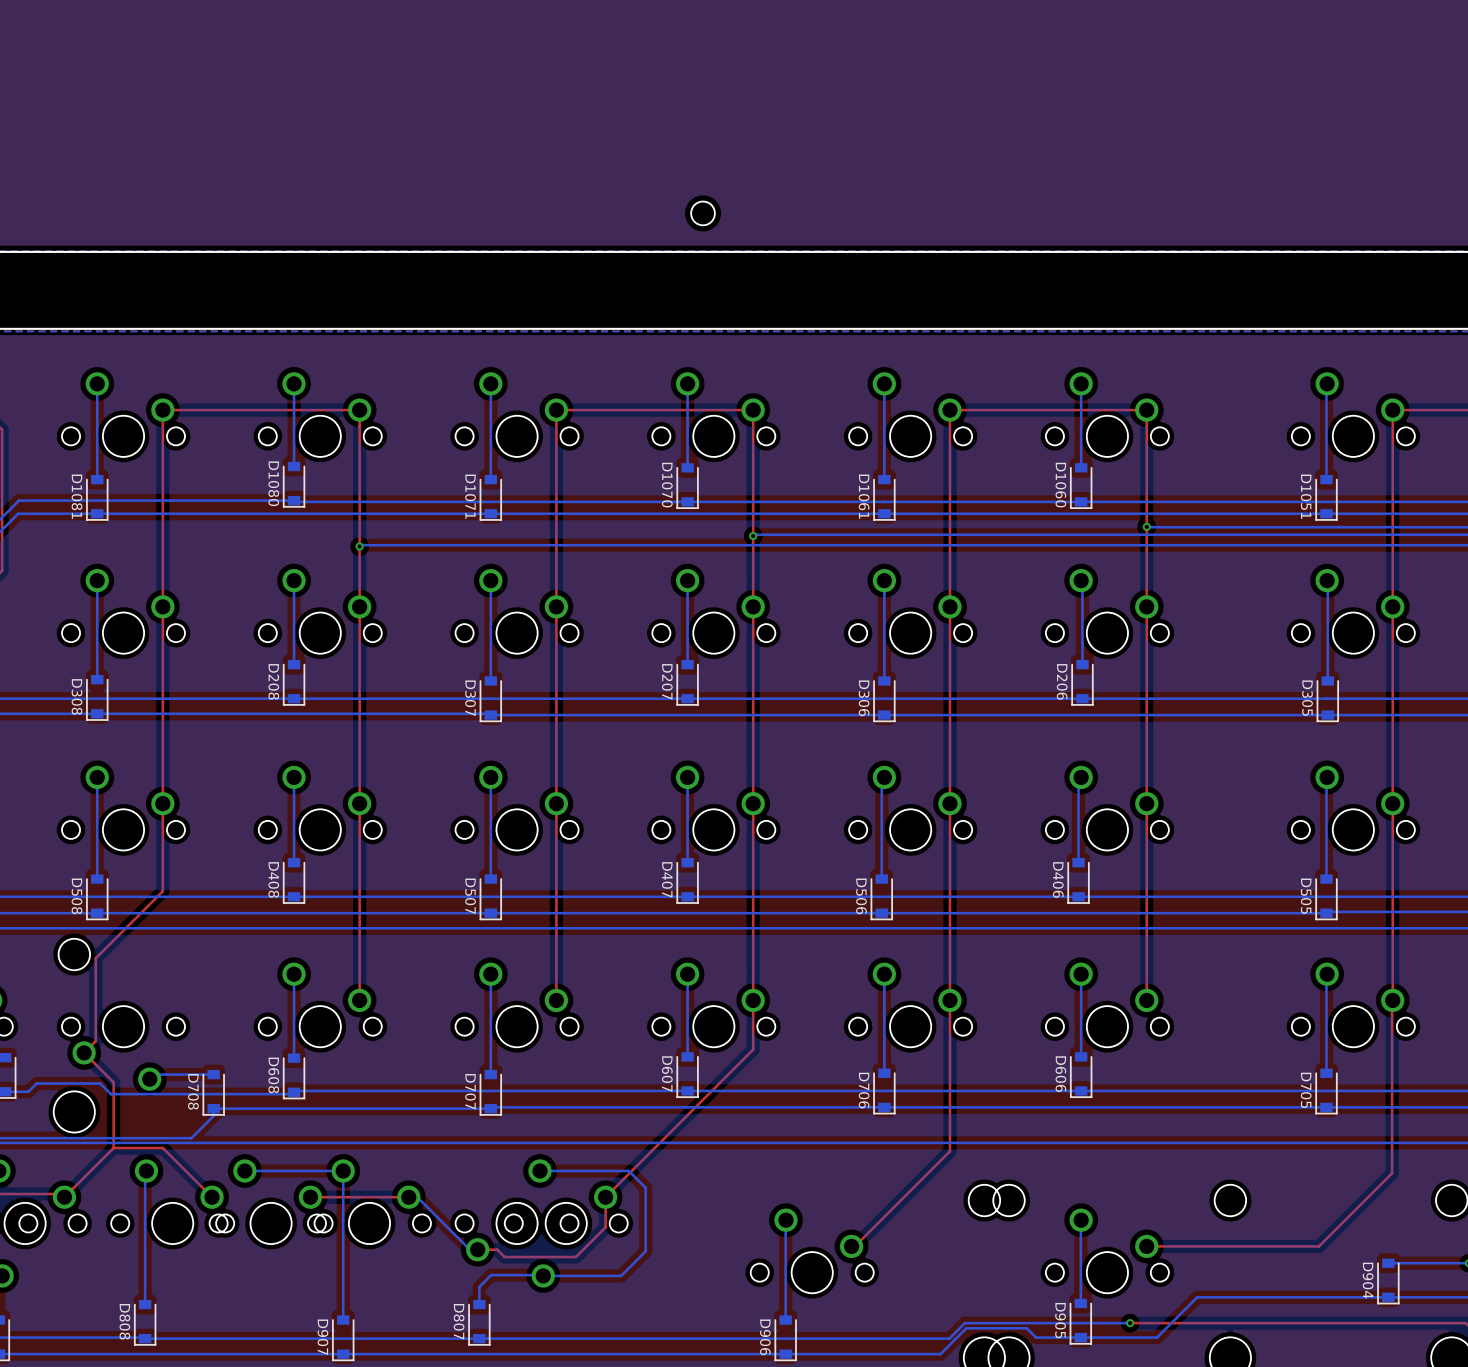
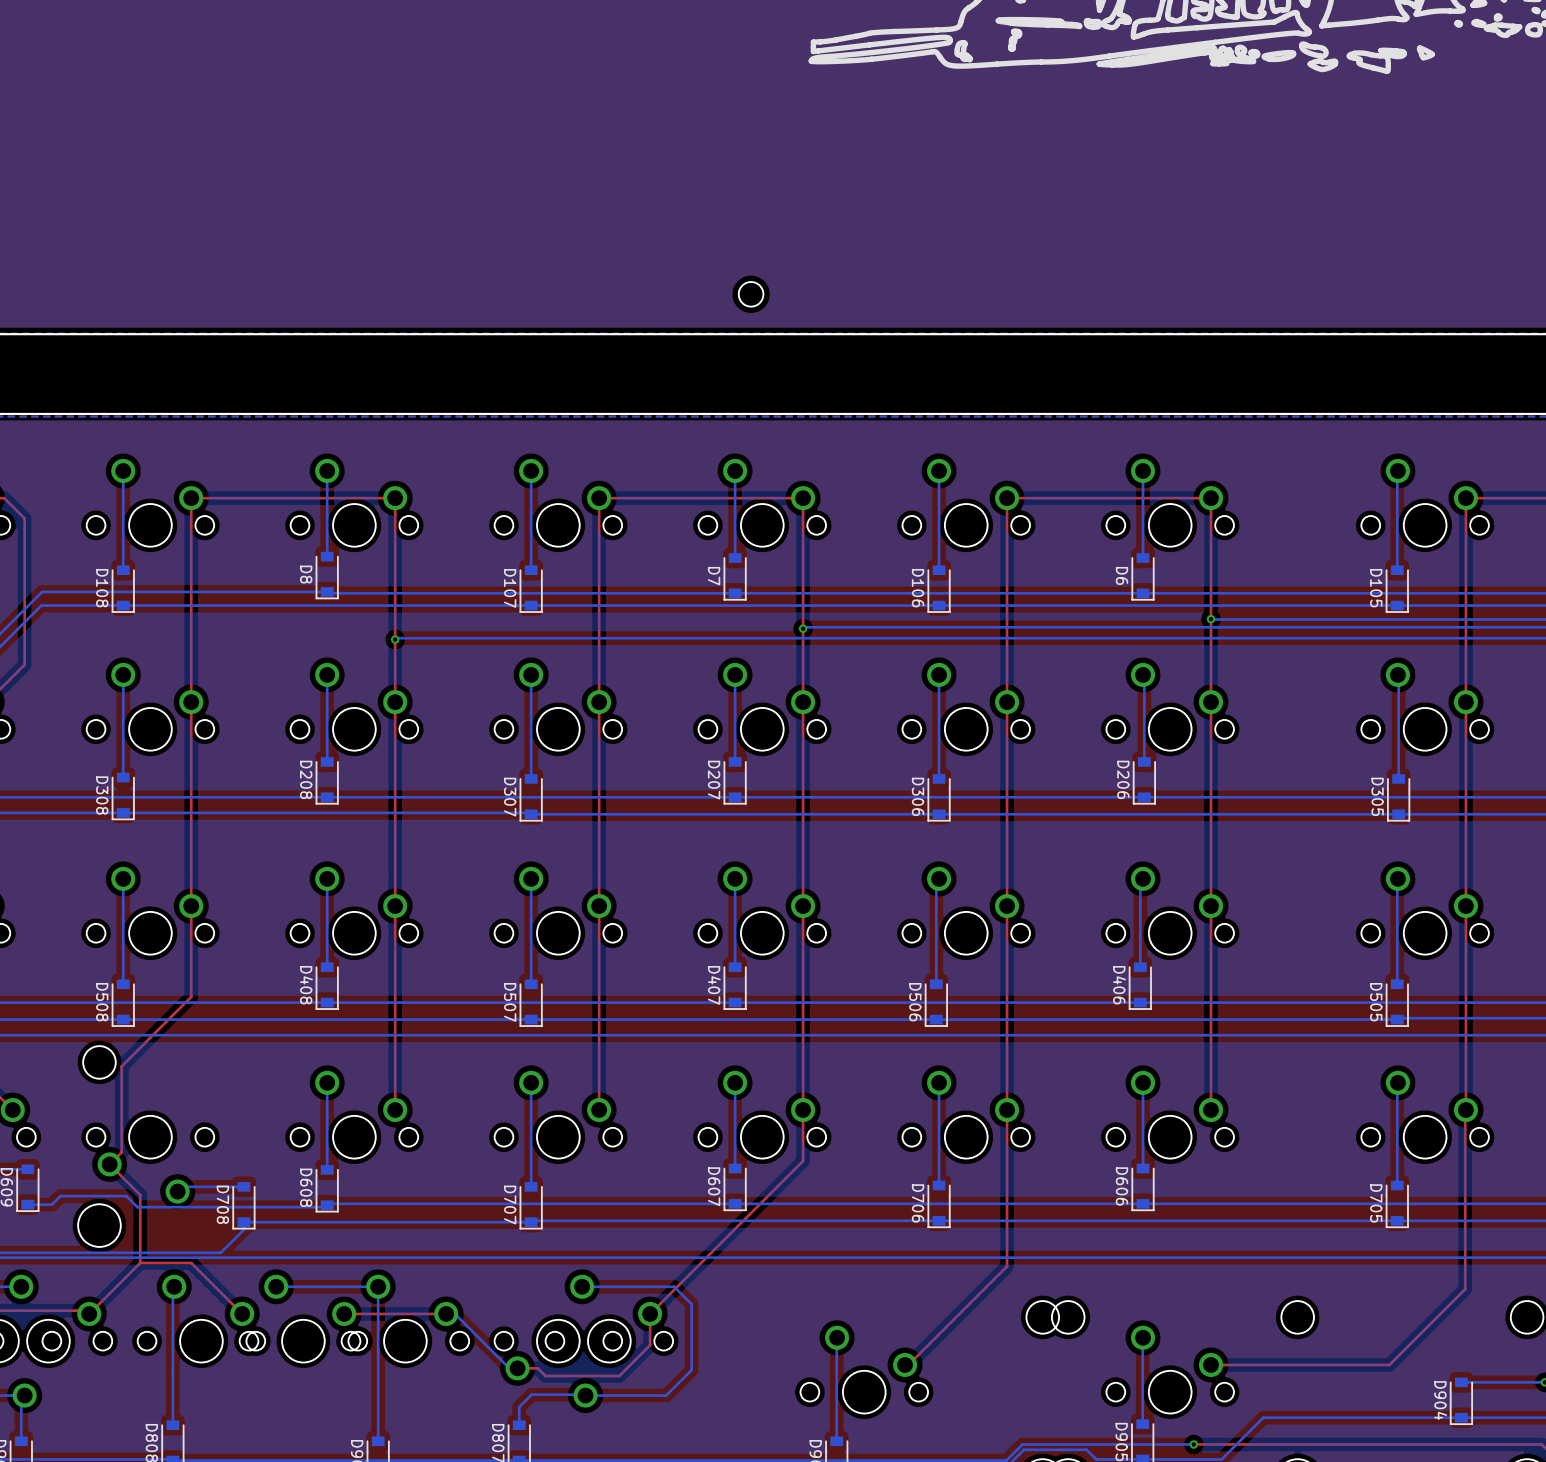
D1080 name: D1080 (273, 483) -> D8 (306, 574)
D1070 name: D1070 (667, 485) -> D7 (714, 576)
D1060 name: D1060 (1060, 485) -> D6 (1122, 575)
D1081 name: D1081 (76, 496) -> D108 (102, 588)
D1071 name: D1071 (470, 496) -> D107 (510, 588)
D1061 name: D1061 (864, 496) -> D106 (918, 588)
D1051 name: D1051 (1306, 496) -> D105 (1376, 588)

